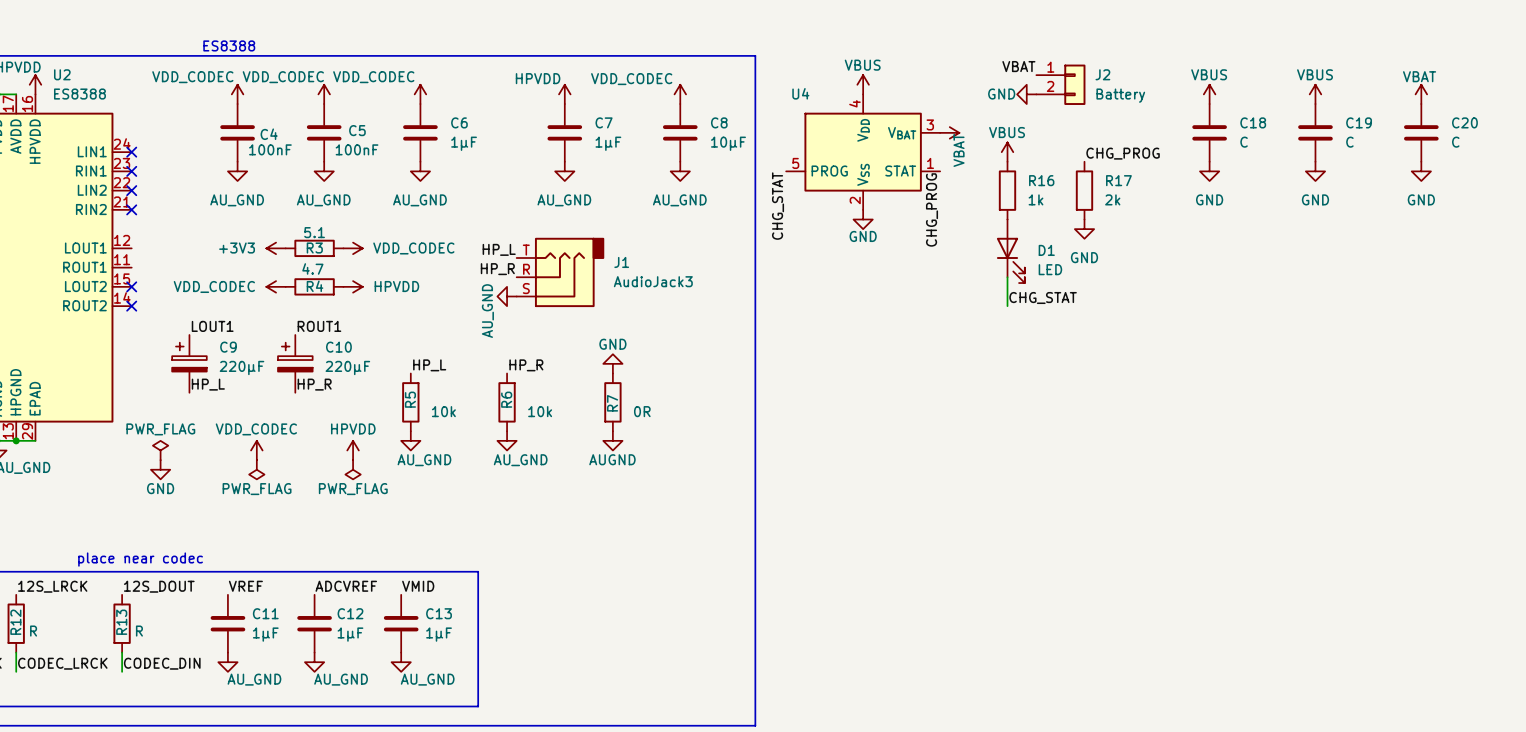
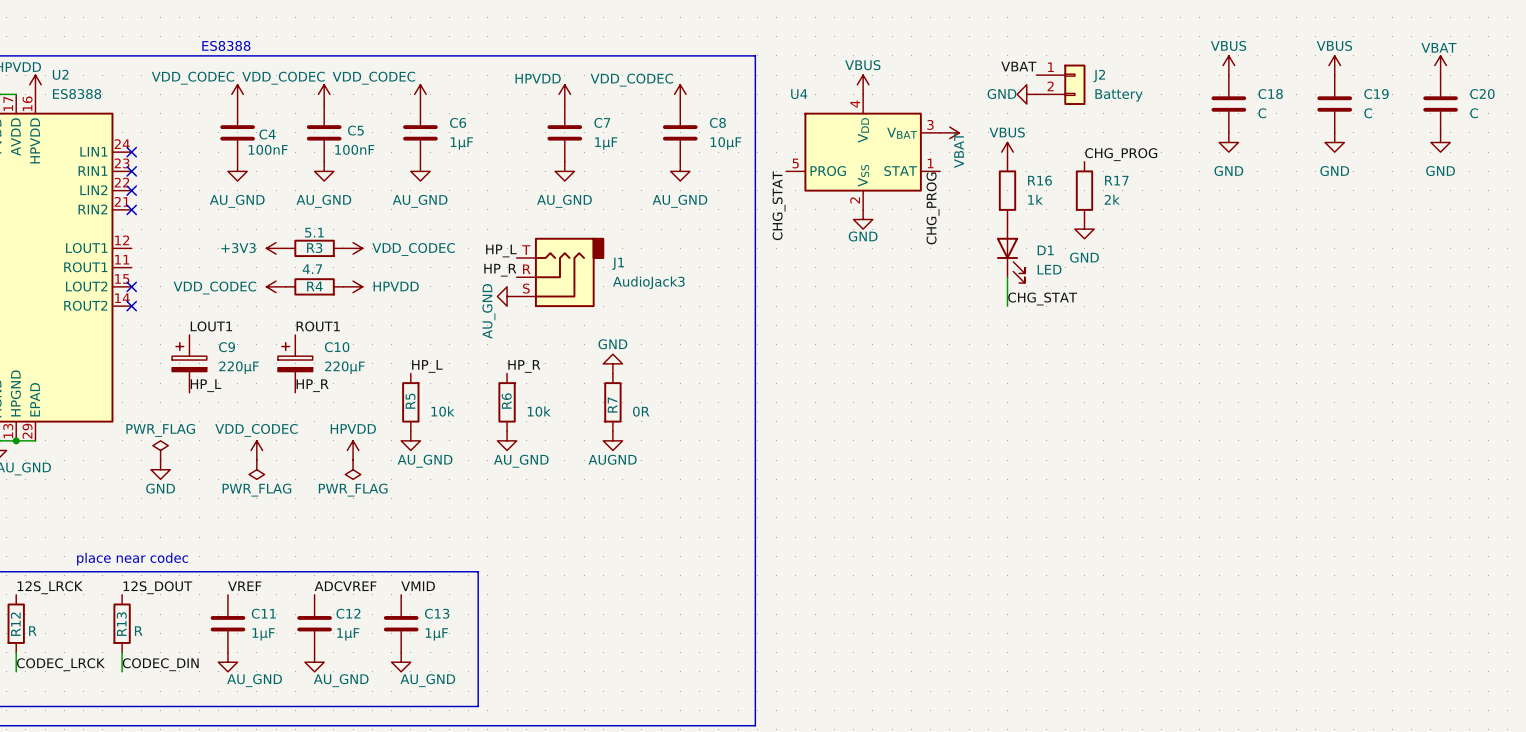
power symbol position: VBUS (1209, 94) -> VBUS (1228, 65)
power symbol position: VBUS (1315, 94) -> VBUS (1334, 65)
power symbol position: VBAT (1421, 94) -> VBAT (1440, 65)
C18 position: (1209, 132) -> (1228, 104)
C19 position: (1315, 132) -> (1334, 104)
C20 position: (1421, 132) -> (1440, 104)
power symbol position: GND (1209, 171) -> GND (1228, 142)
power symbol position: GND (1315, 171) -> GND (1334, 142)
power symbol position: GND (1421, 171) -> GND (1440, 142)

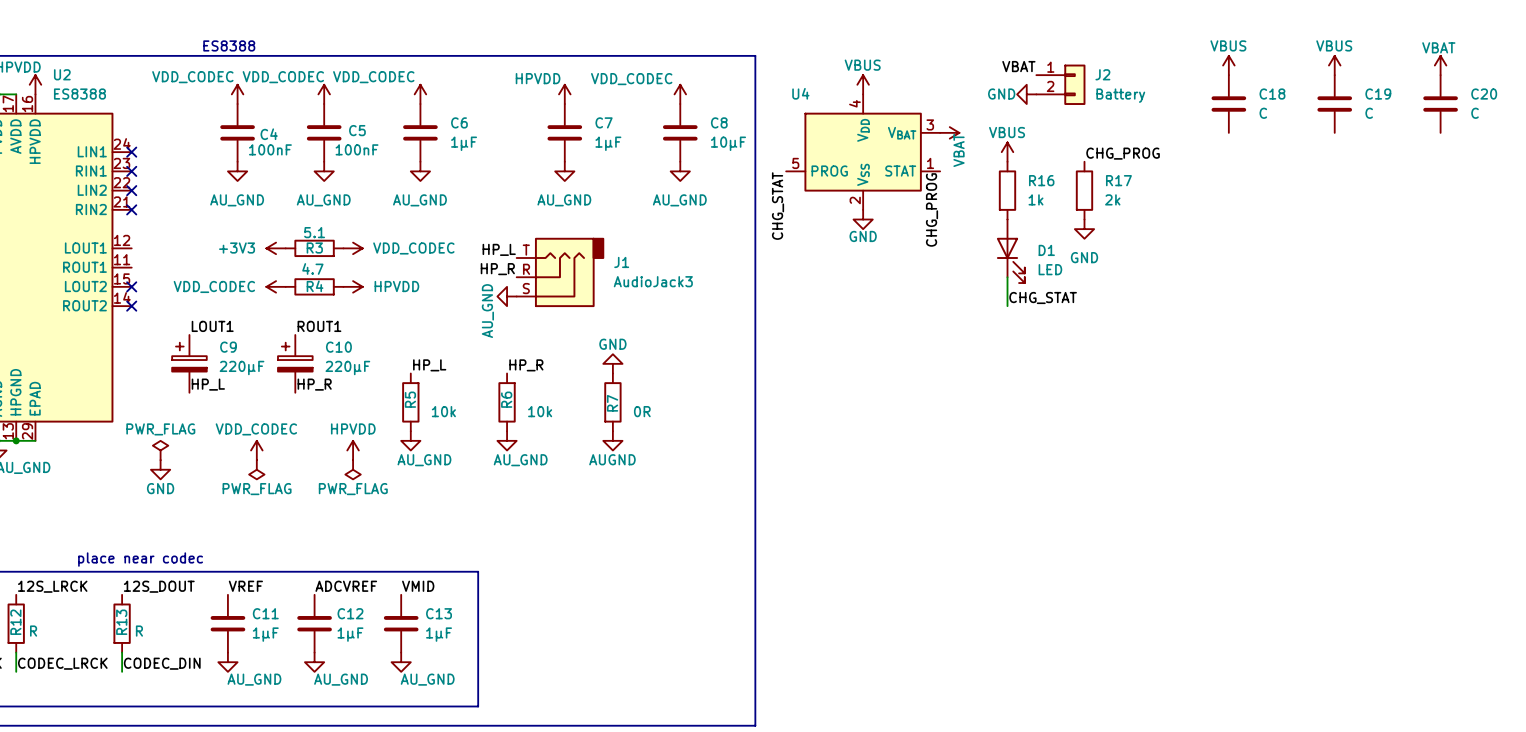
power symbol: GND (1228, 142) -> none
power symbol: GND (1334, 142) -> none
power symbol: GND (1440, 142) -> none

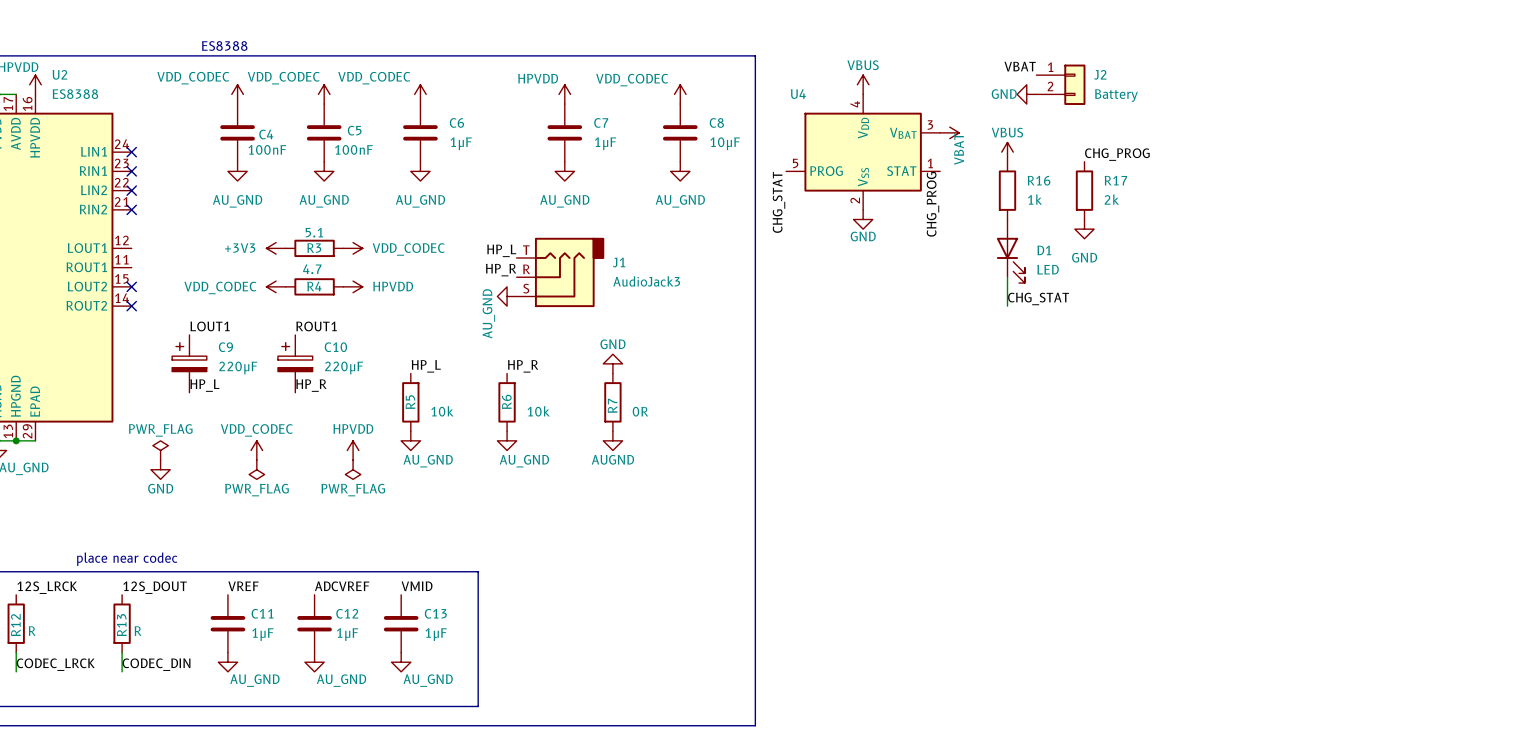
power symbol: VBUS (1228, 65) -> none
power symbol: VBUS (1334, 65) -> none
power symbol: VBAT (1440, 65) -> none
C18: C (1228, 104) -> none
C19: C (1334, 104) -> none
C20: C (1440, 104) -> none

